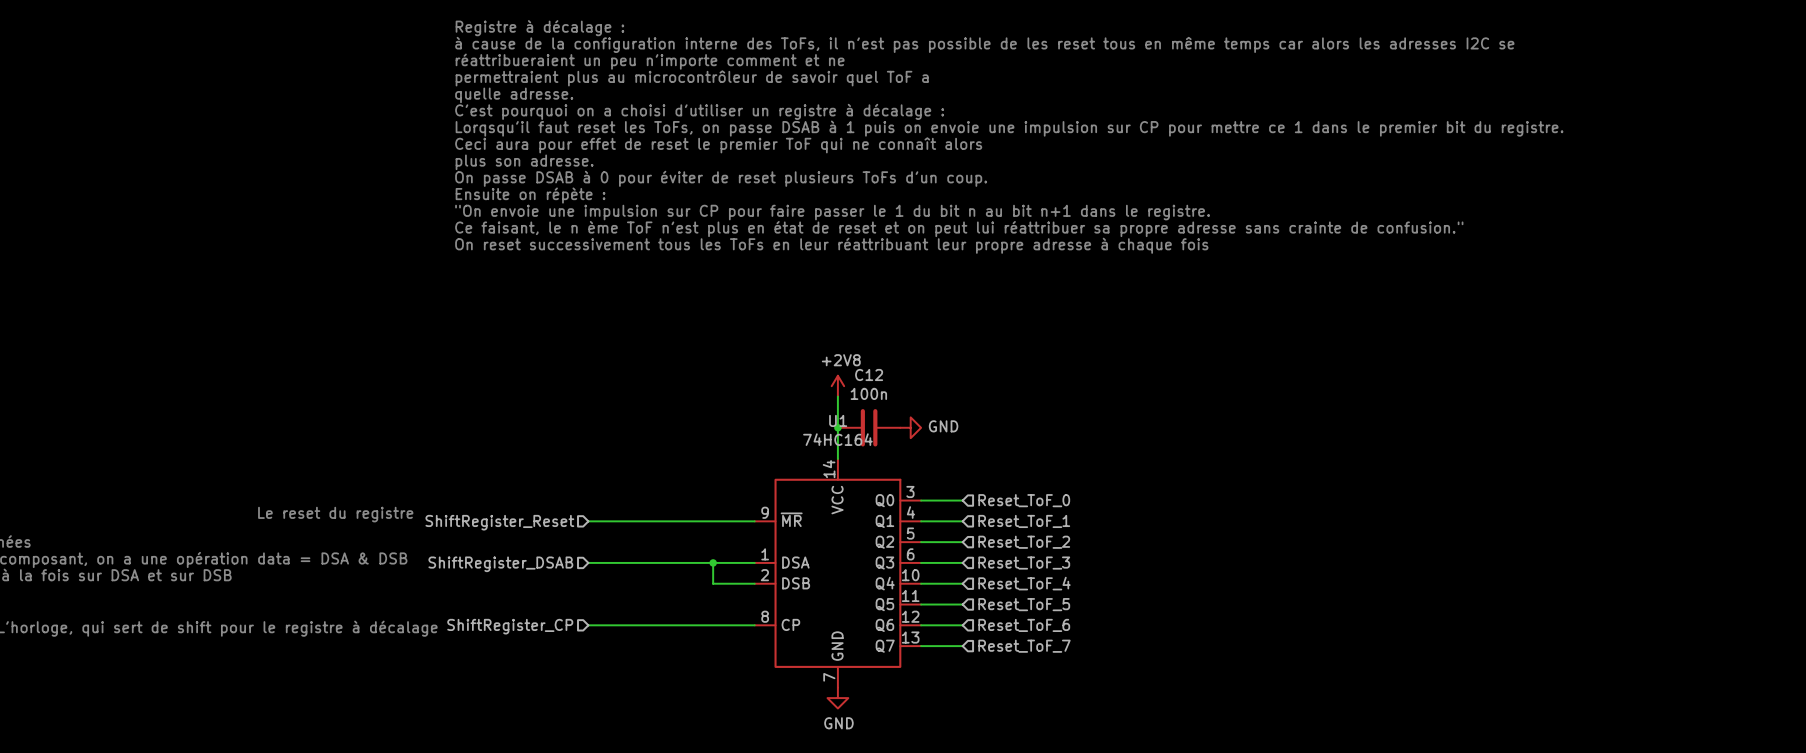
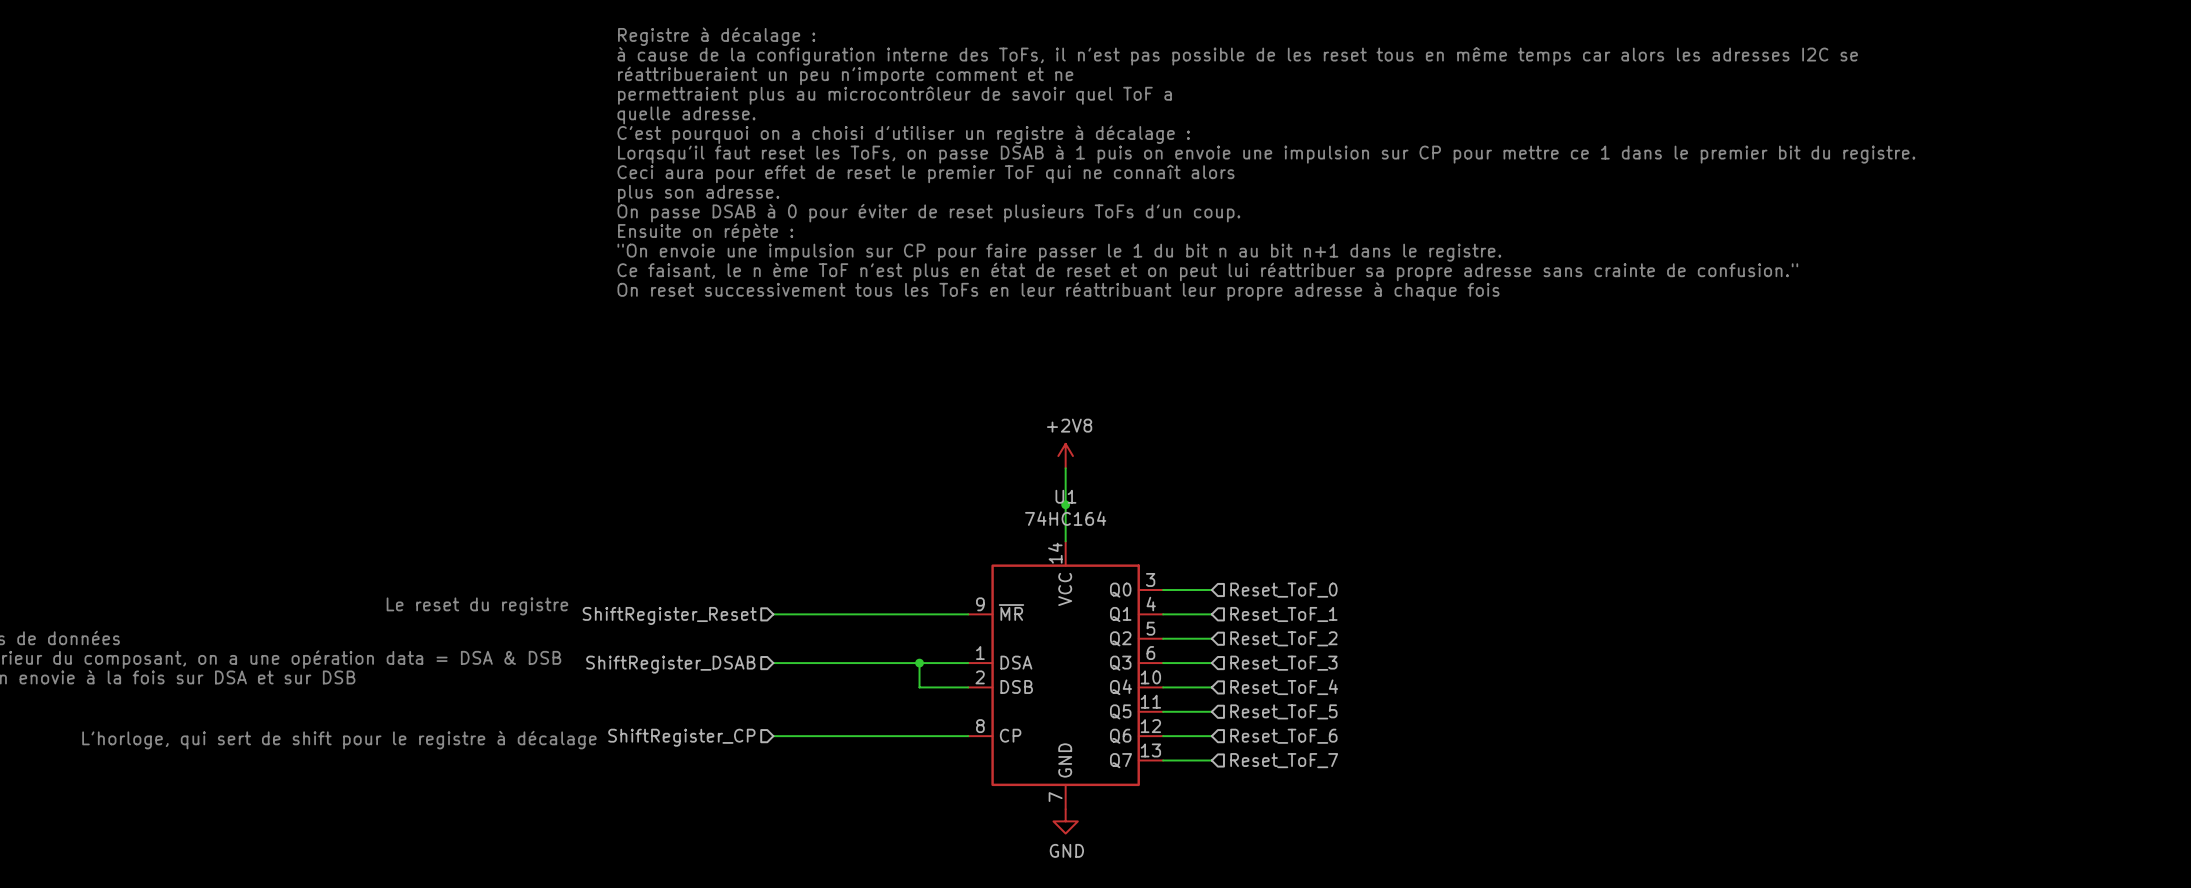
C12: 100n (869, 427) -> none
power symbol: GND (910, 427) -> none

